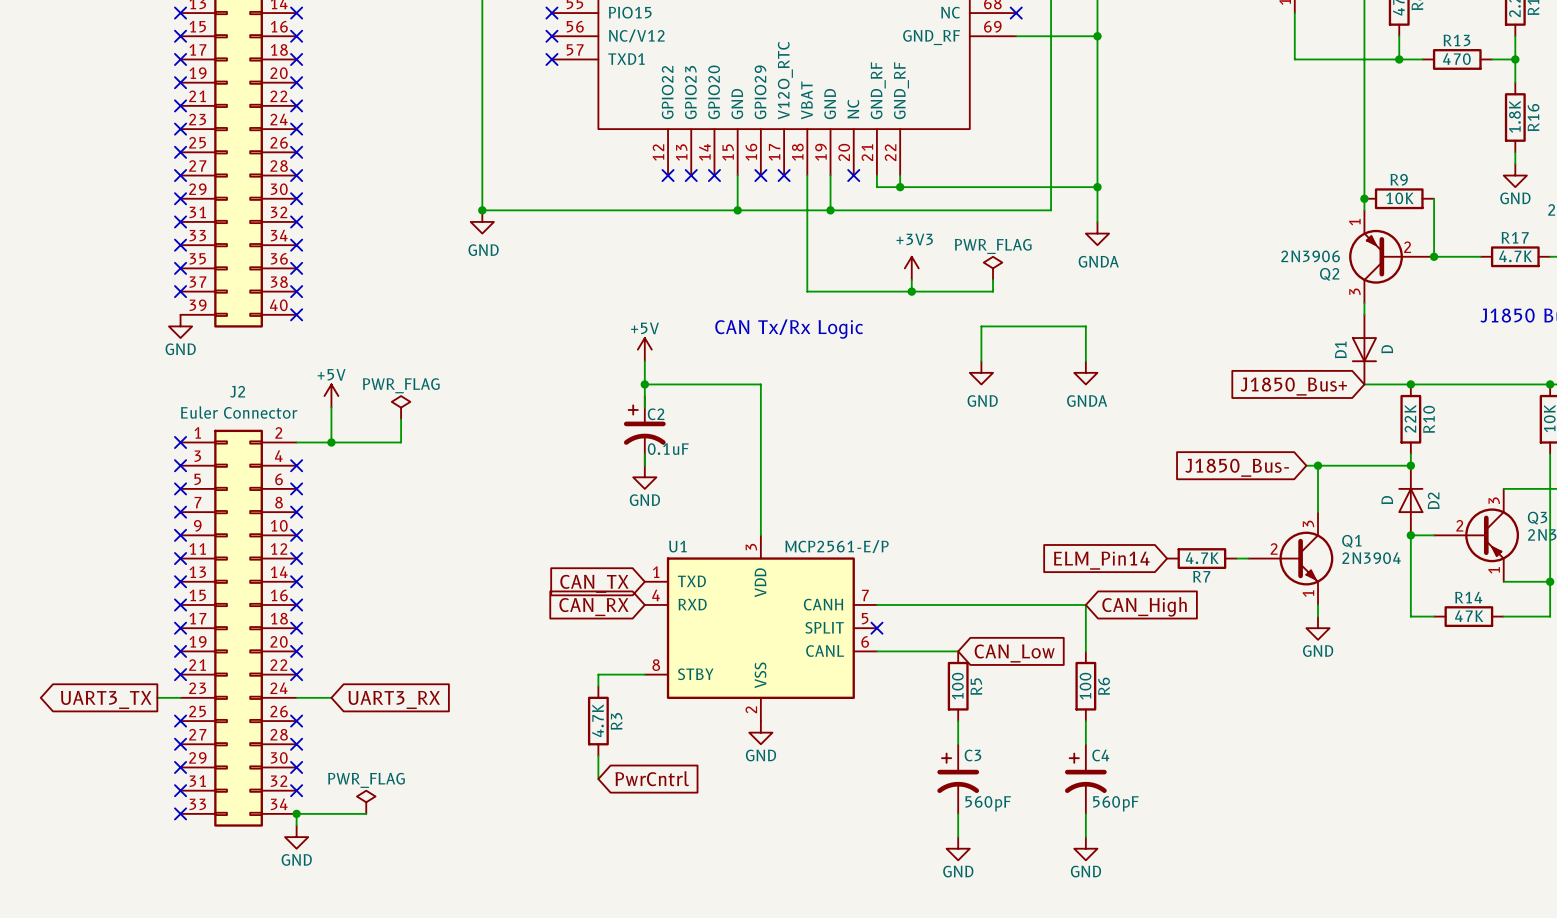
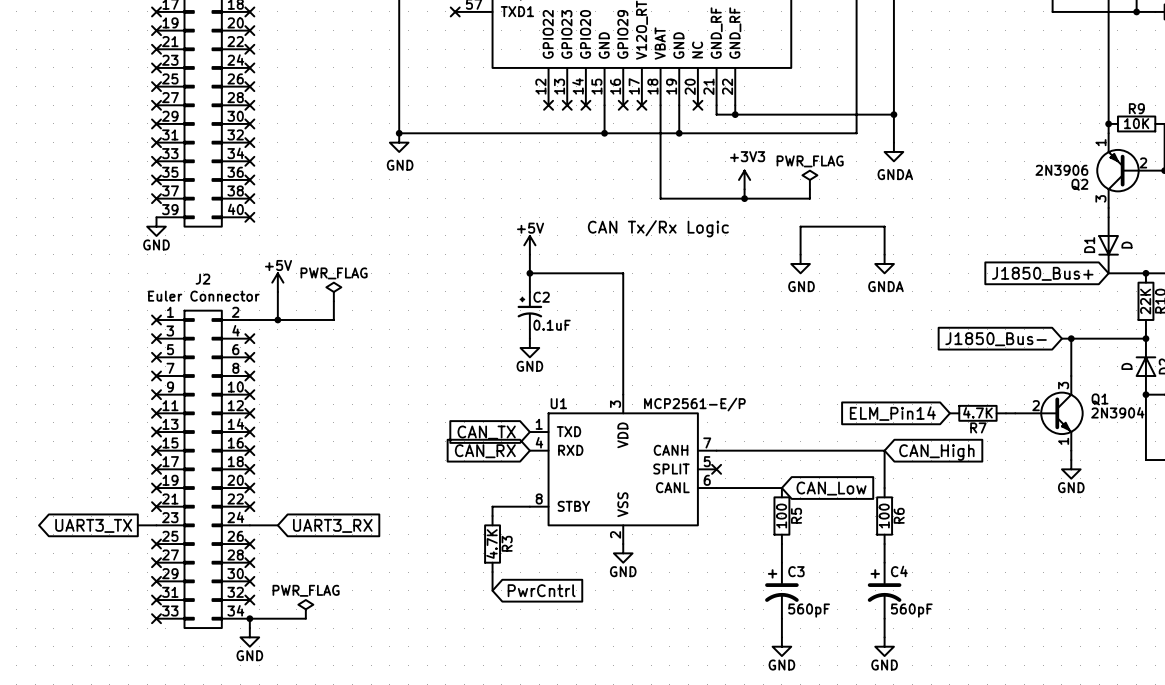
C2 symbol: [623, 396, 666, 466] -> [517, 291, 543, 330]

